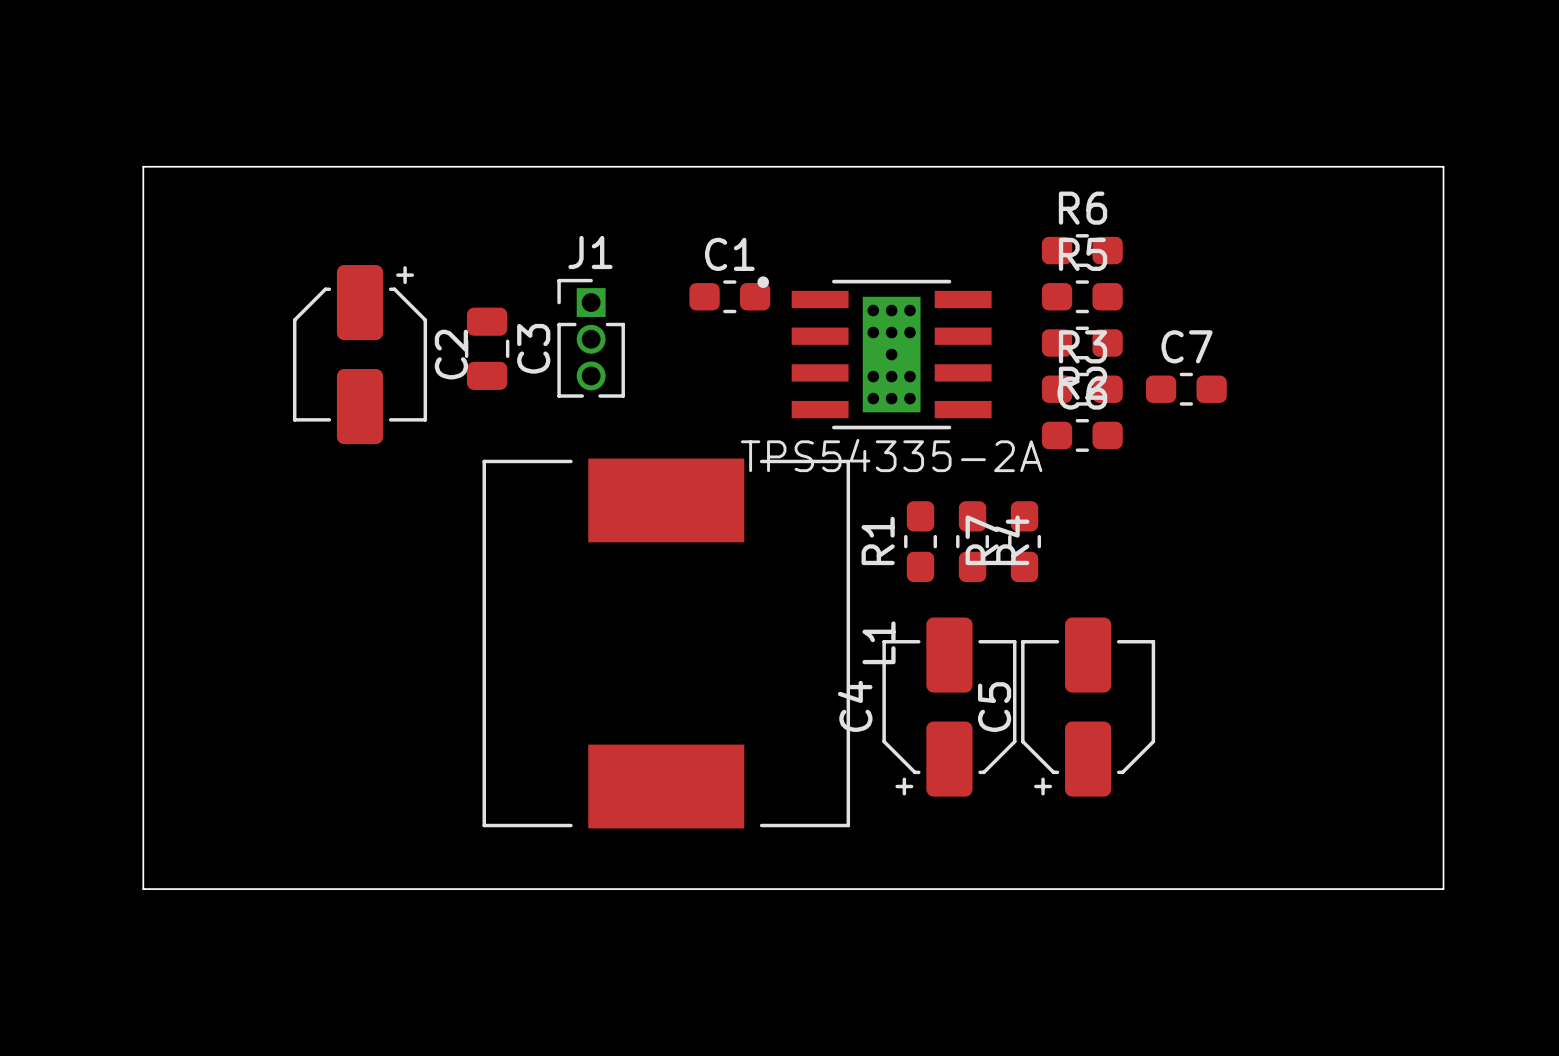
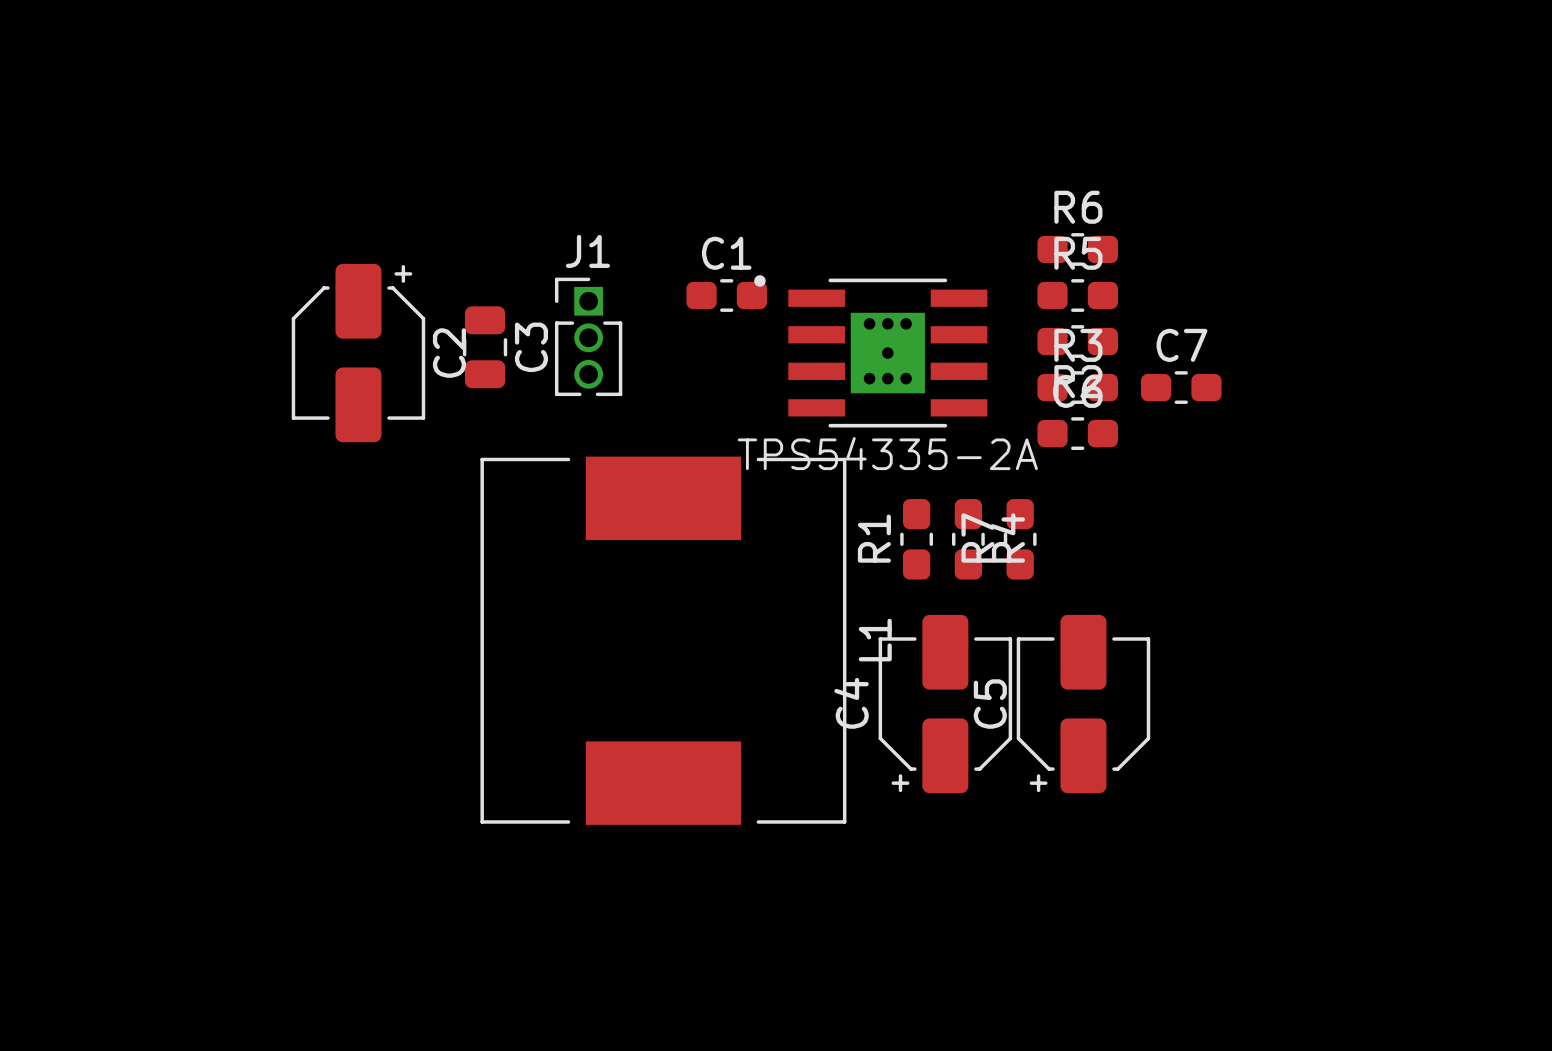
board edge: (143, 166) (1443, 166) (1443, 889) (143, 889) (143, 166) -> none
part footprint: [757, 276, 992, 430] -> [754, 275, 988, 428]

